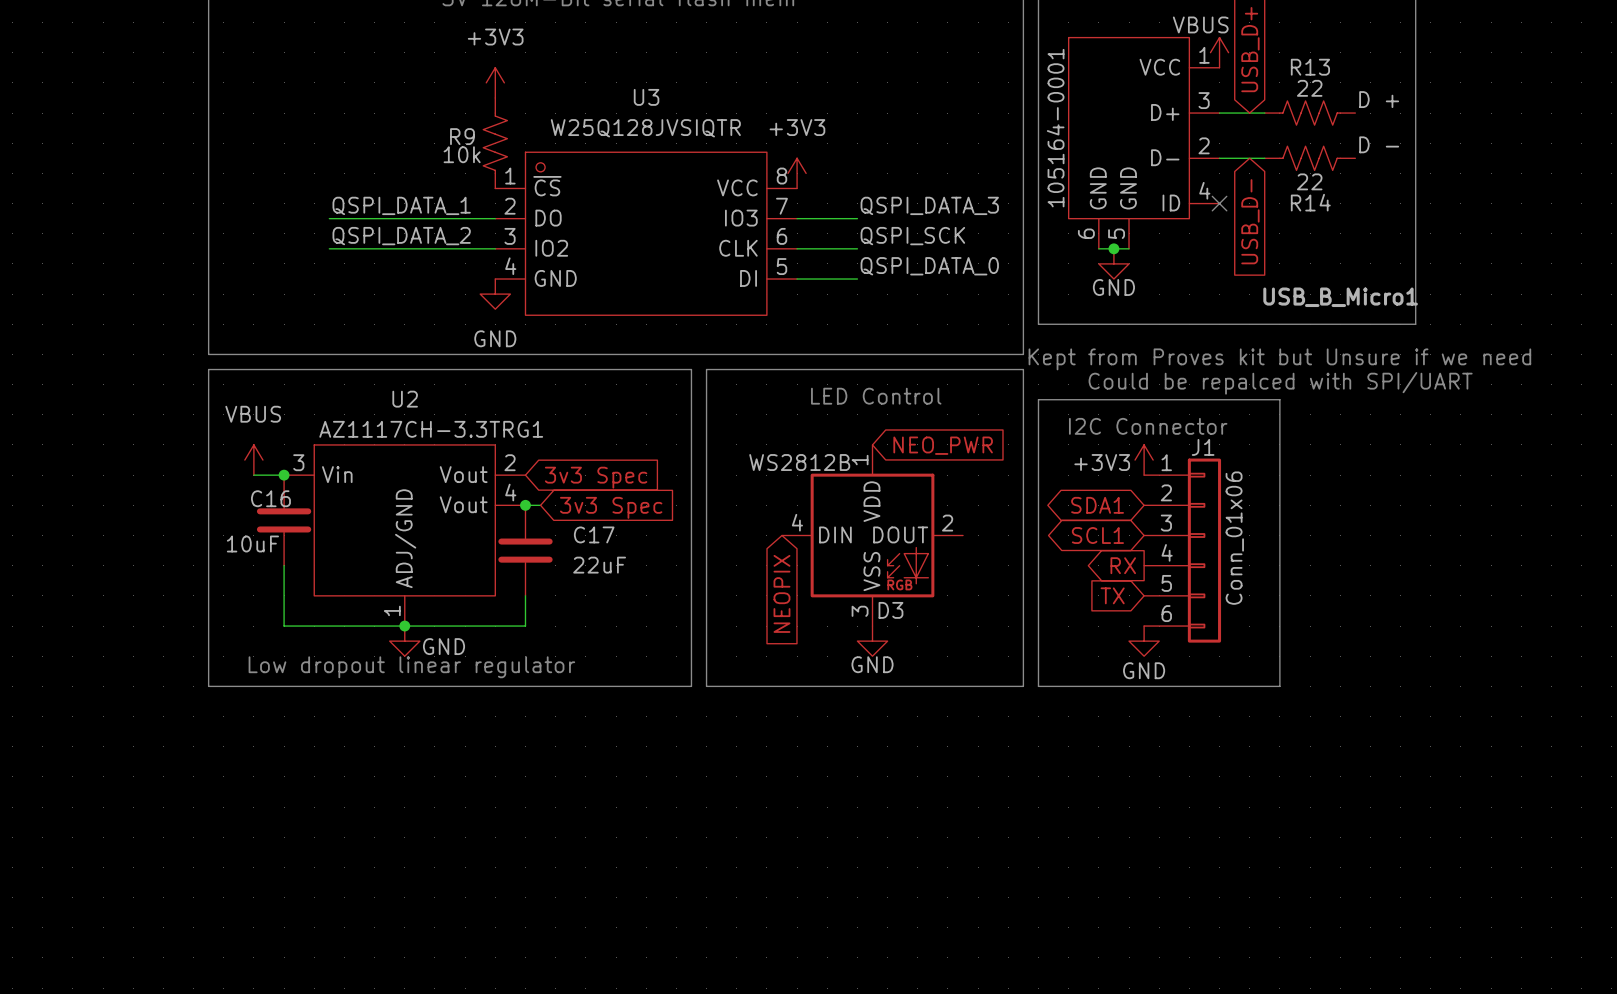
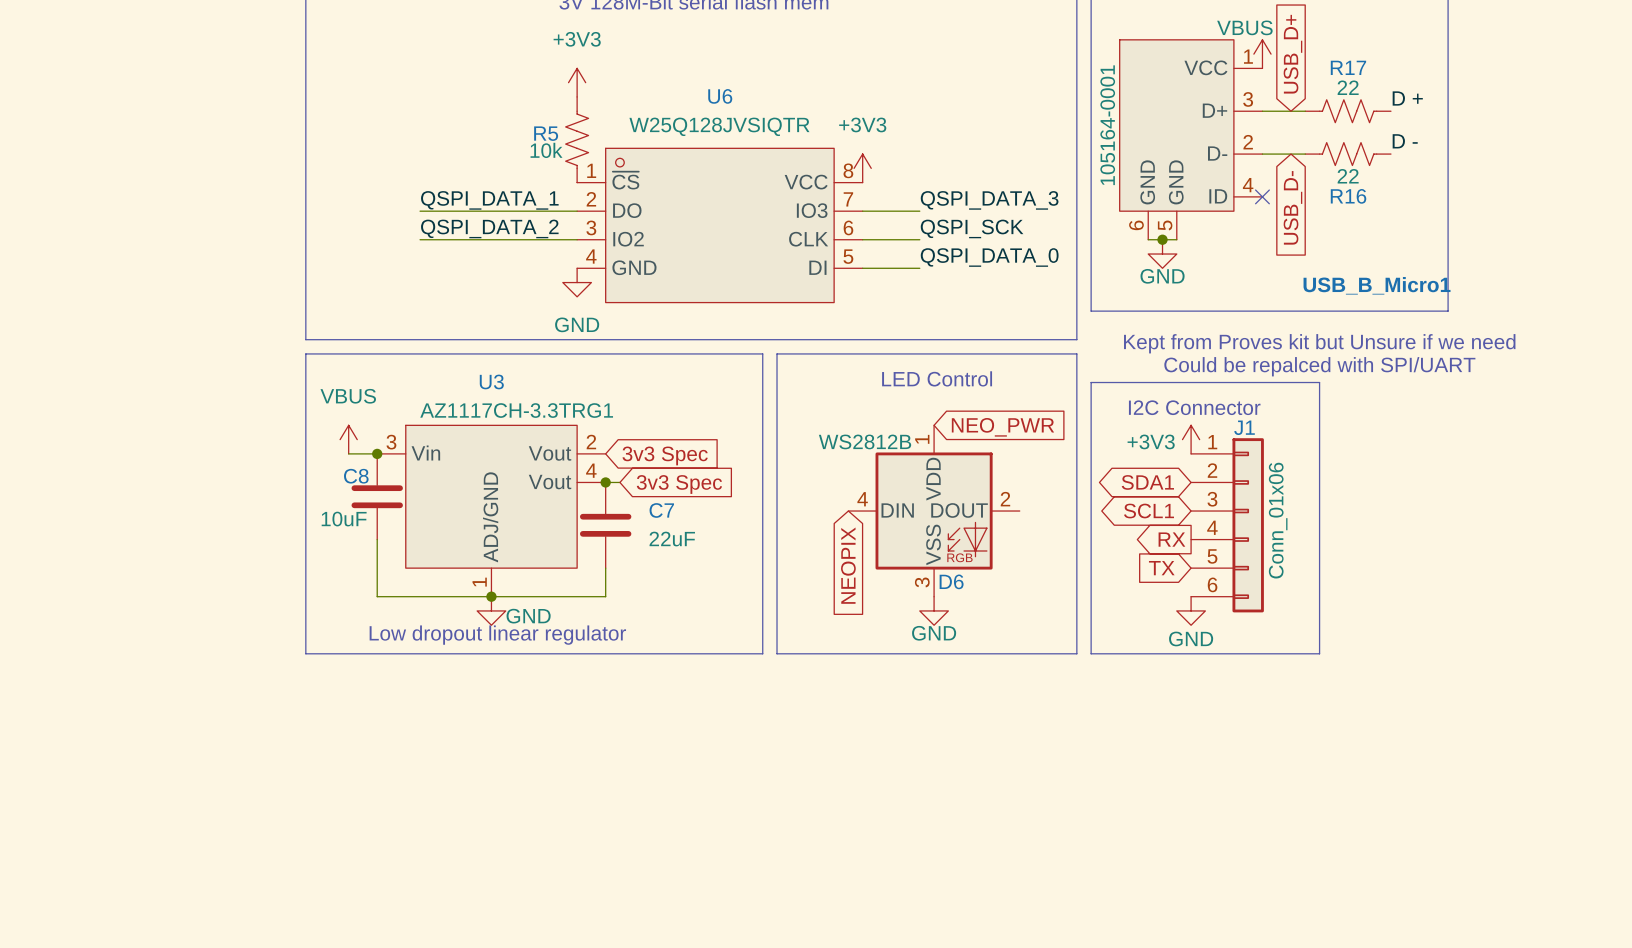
R13 name: R13 (1310, 67) -> R17 (1348, 67)
U3 name: U3 (646, 97) -> U6 (720, 96)
R9 name: R9 (462, 136) -> R5 (546, 133)
R14 name: R14 (1310, 202) -> R16 (1348, 196)
U2 name: U2 (405, 399) -> U3 (491, 381)
C16 name: C16 (270, 498) -> C8 (356, 476)
C17 name: C17 (594, 534) -> C7 (661, 510)
D3 name: D3 (890, 610) -> D6 (951, 581)

